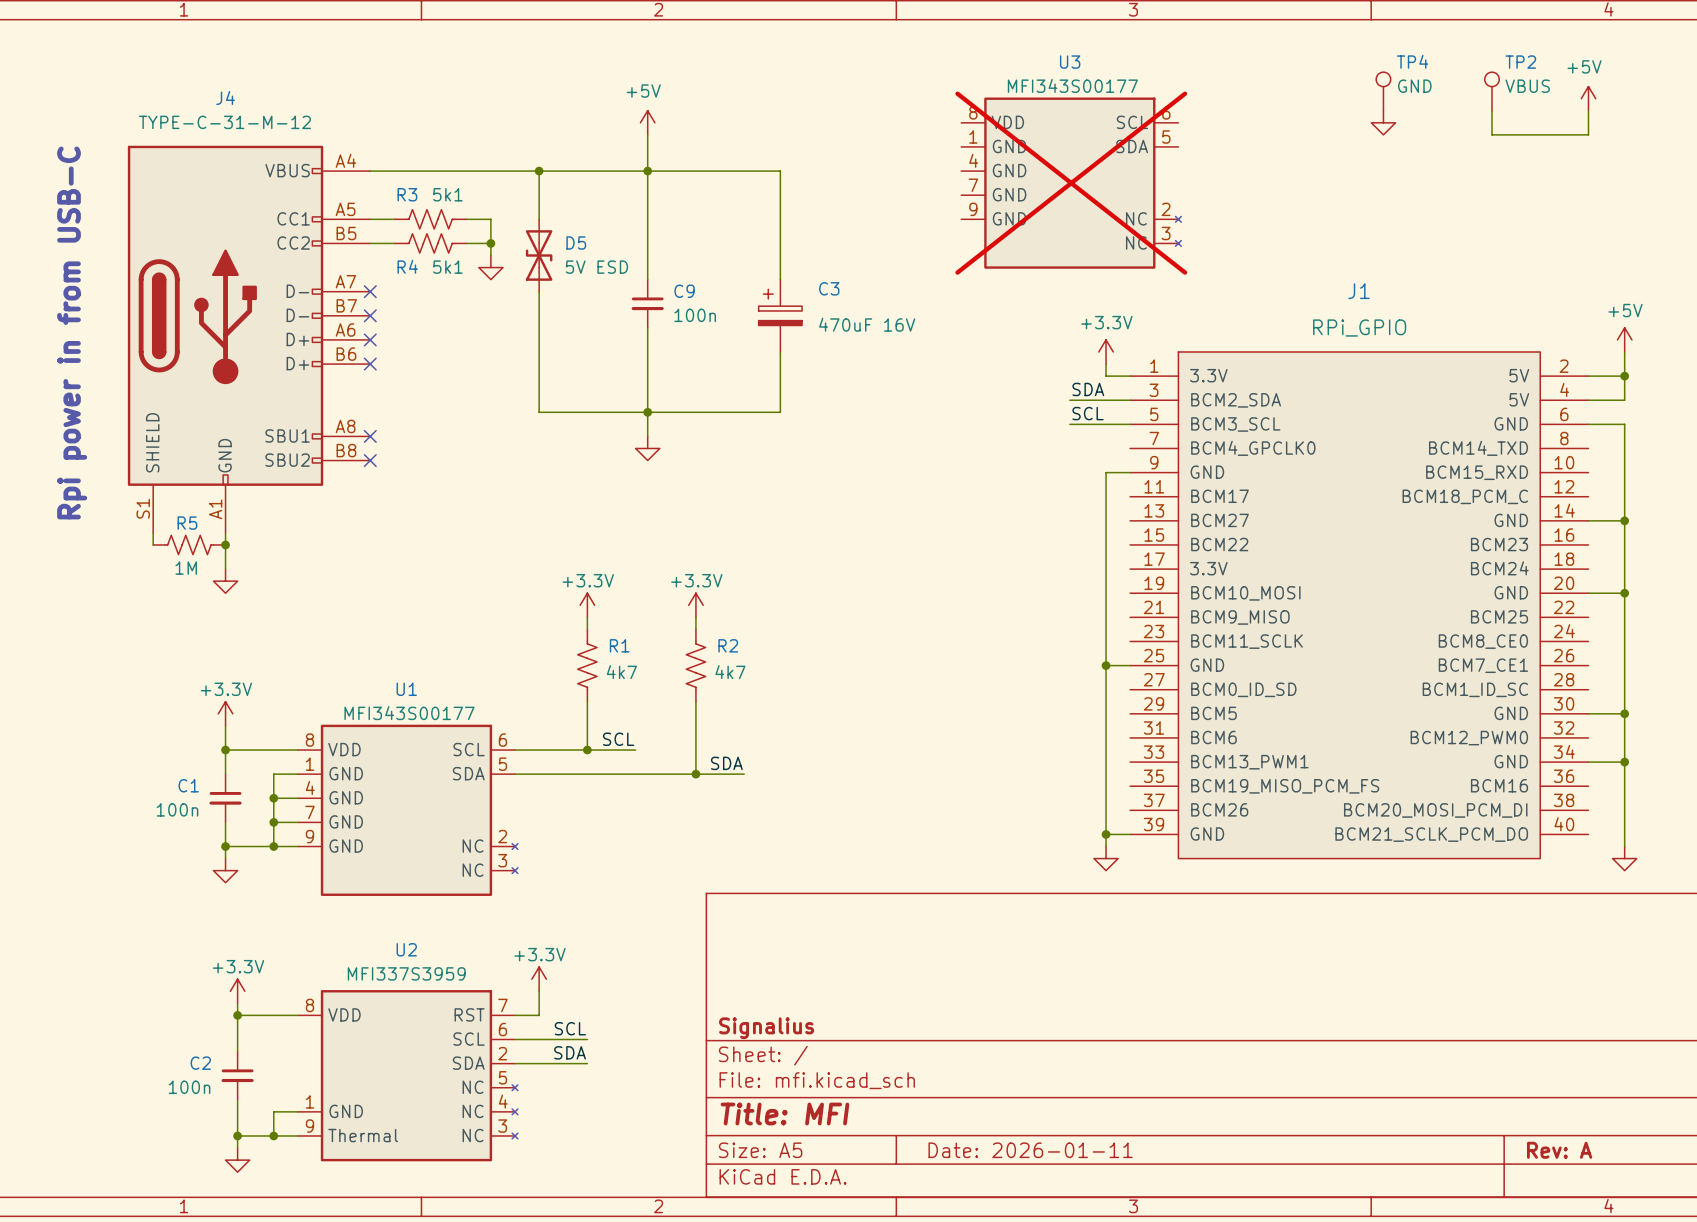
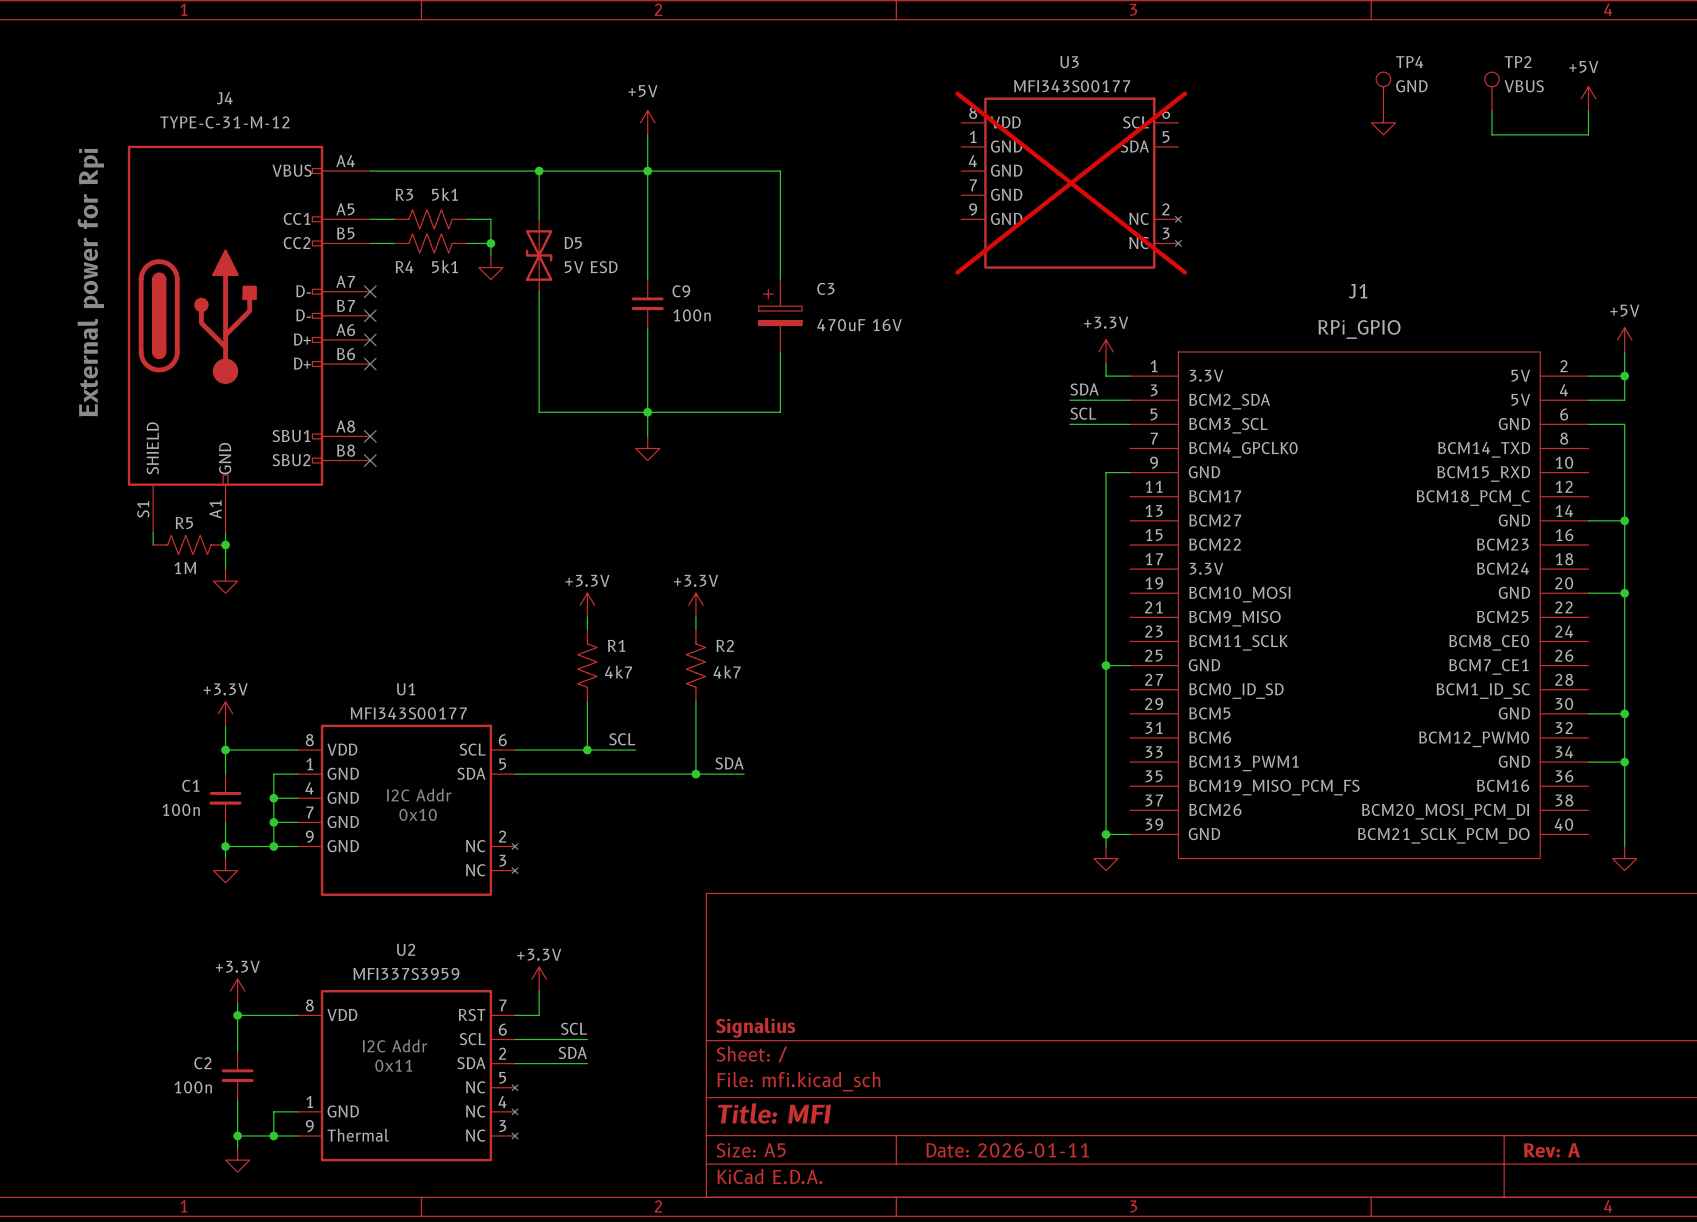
text: none -> External power for Rpi (90, 282)
text: Rpi power in from USB-C (72, 332) -> none
text: none -> I2C Addr (419, 795)
text: none -> 0x10 (418, 814)
text: none -> I2C Addr (395, 1045)
text: none -> 0x11 (393, 1065)

